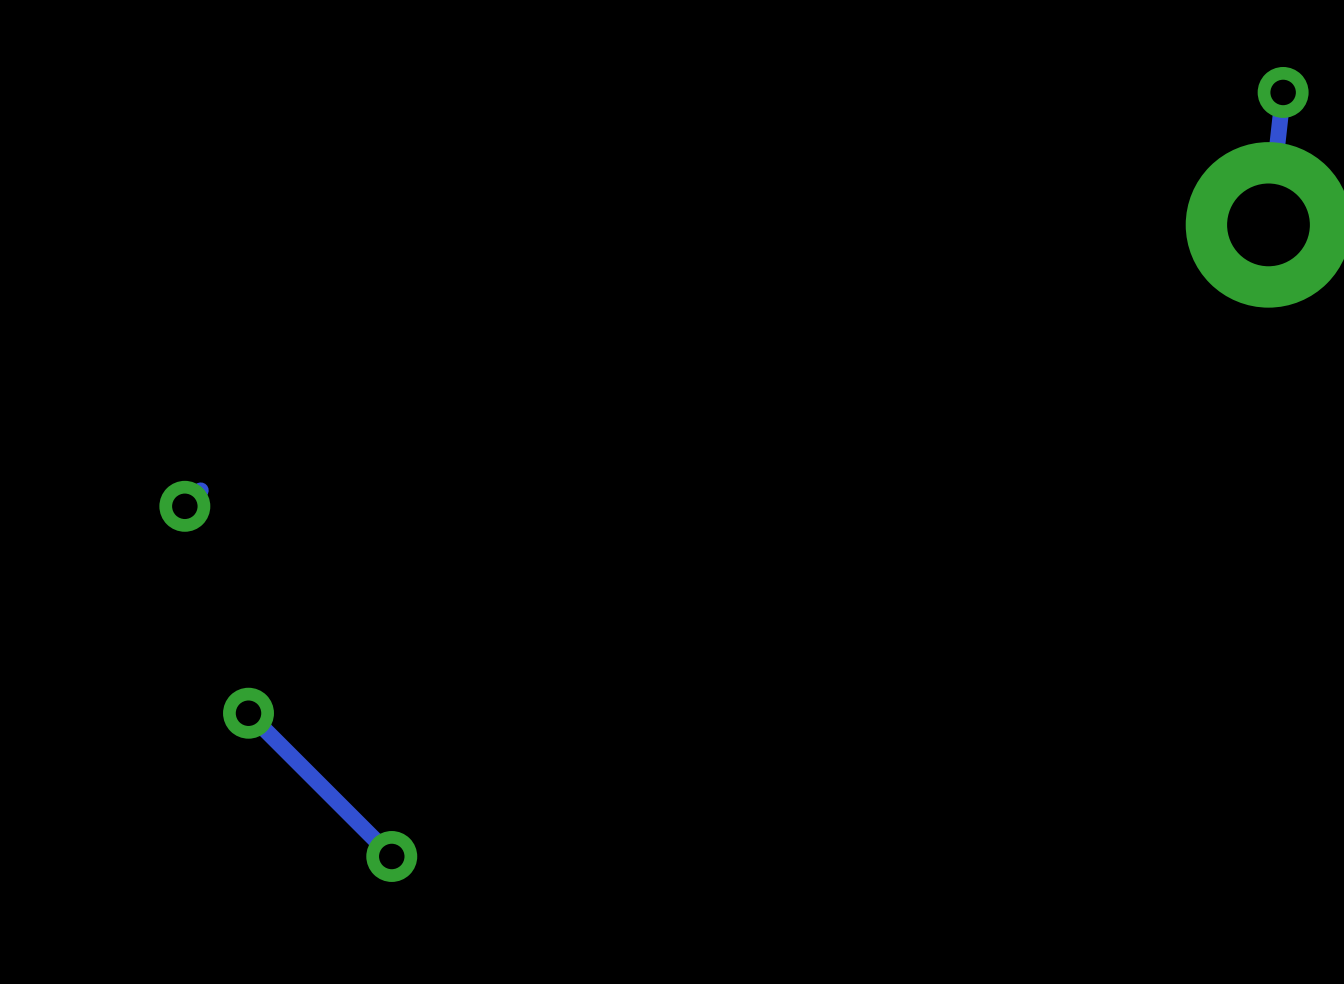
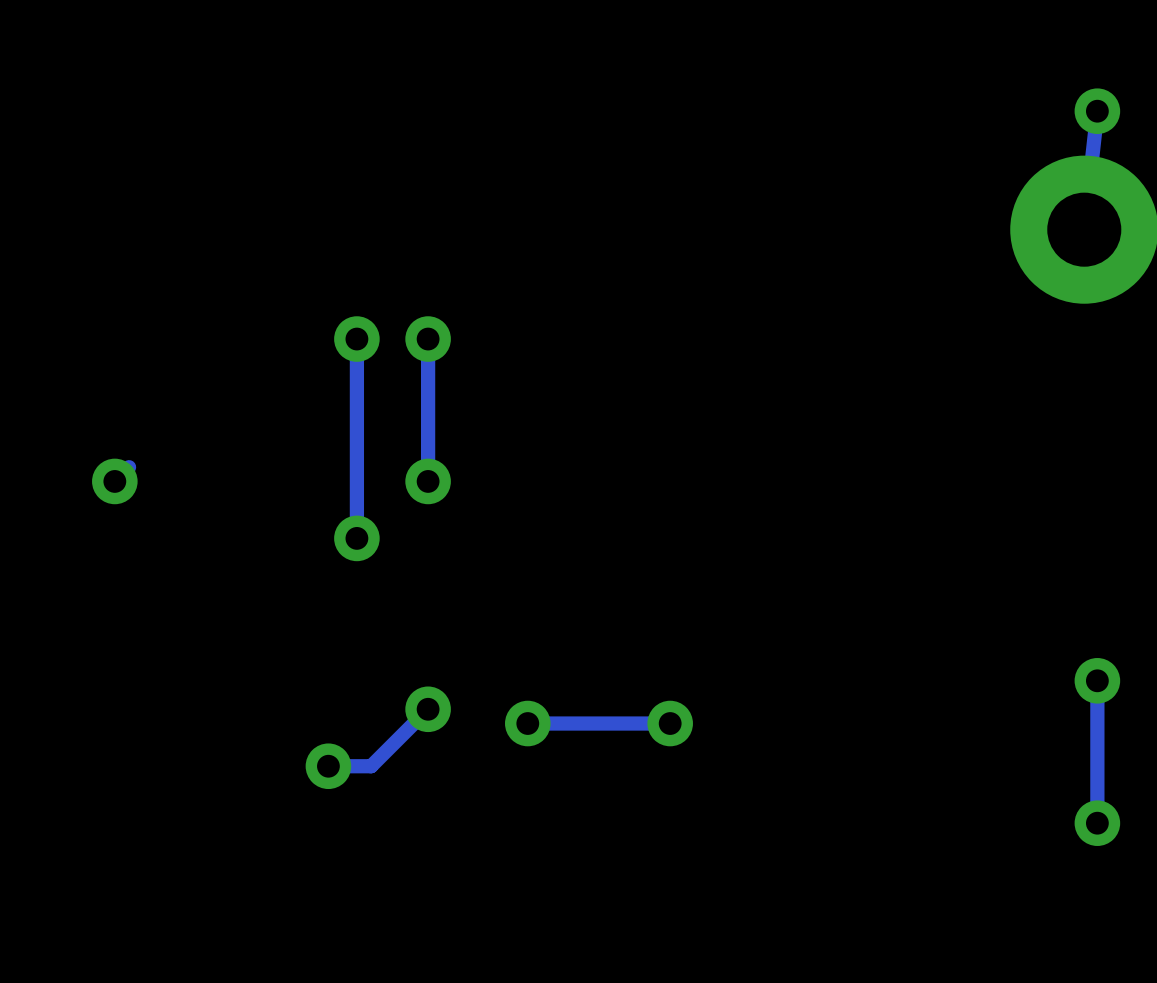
track: none -> (356, 339) (356, 538)
via: none -> (356, 339)
track: none -> (428, 339) (428, 481)
via: none -> (428, 339)
via: none -> (428, 481)
via: none -> (356, 538)
track: (248, 713) (391, 856) -> none
via: (248, 713) -> none
track: none -> (1097, 680) (1097, 823)
via: none -> (1097, 680)
track: none -> (428, 709) (371, 766) (328, 766)
via: none -> (428, 709)
via: none -> (527, 723)
track: none -> (670, 723) (527, 723)
via: none -> (670, 723)
via position: (391, 856) -> (328, 766)
via: none -> (1097, 823)

